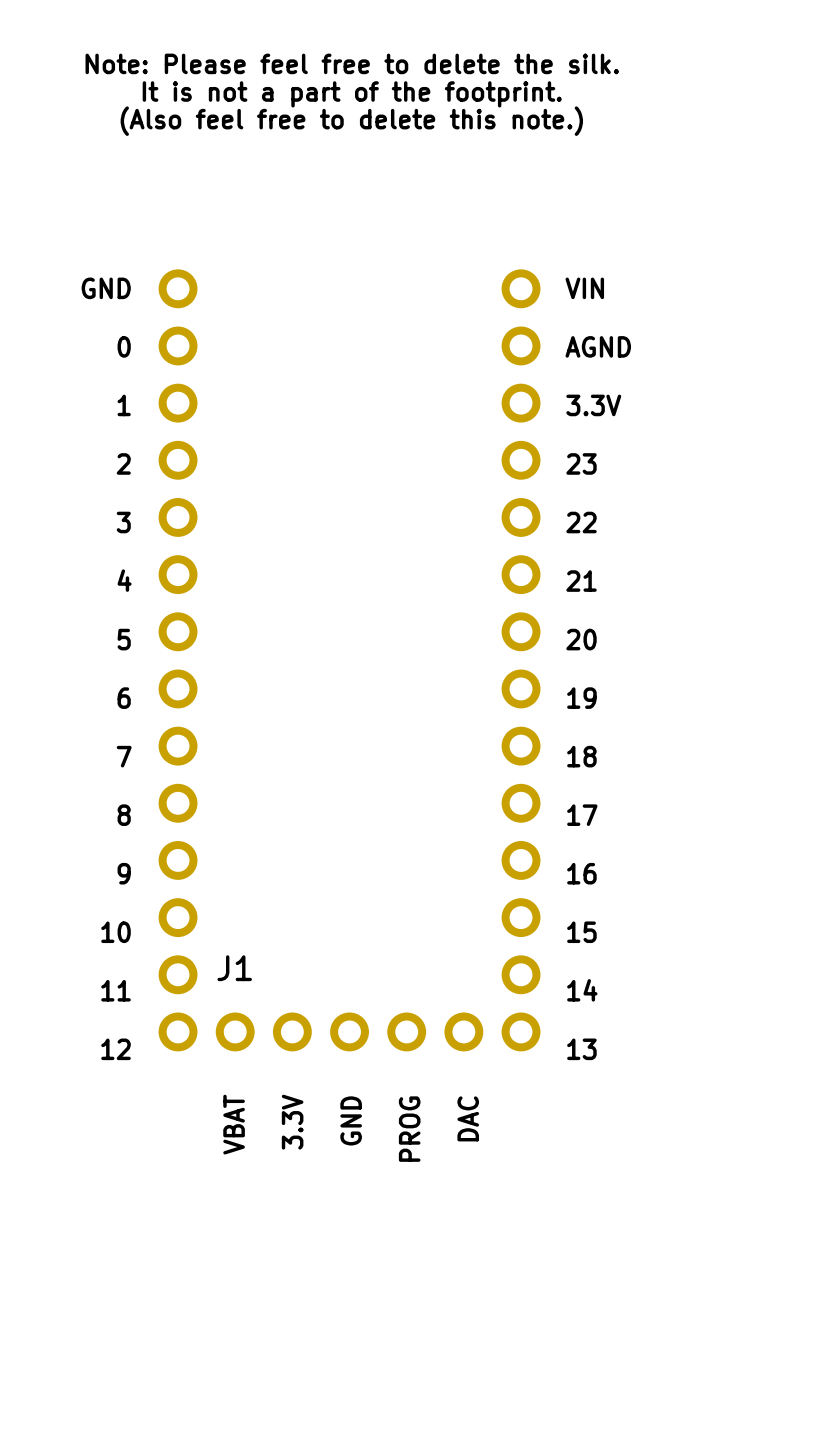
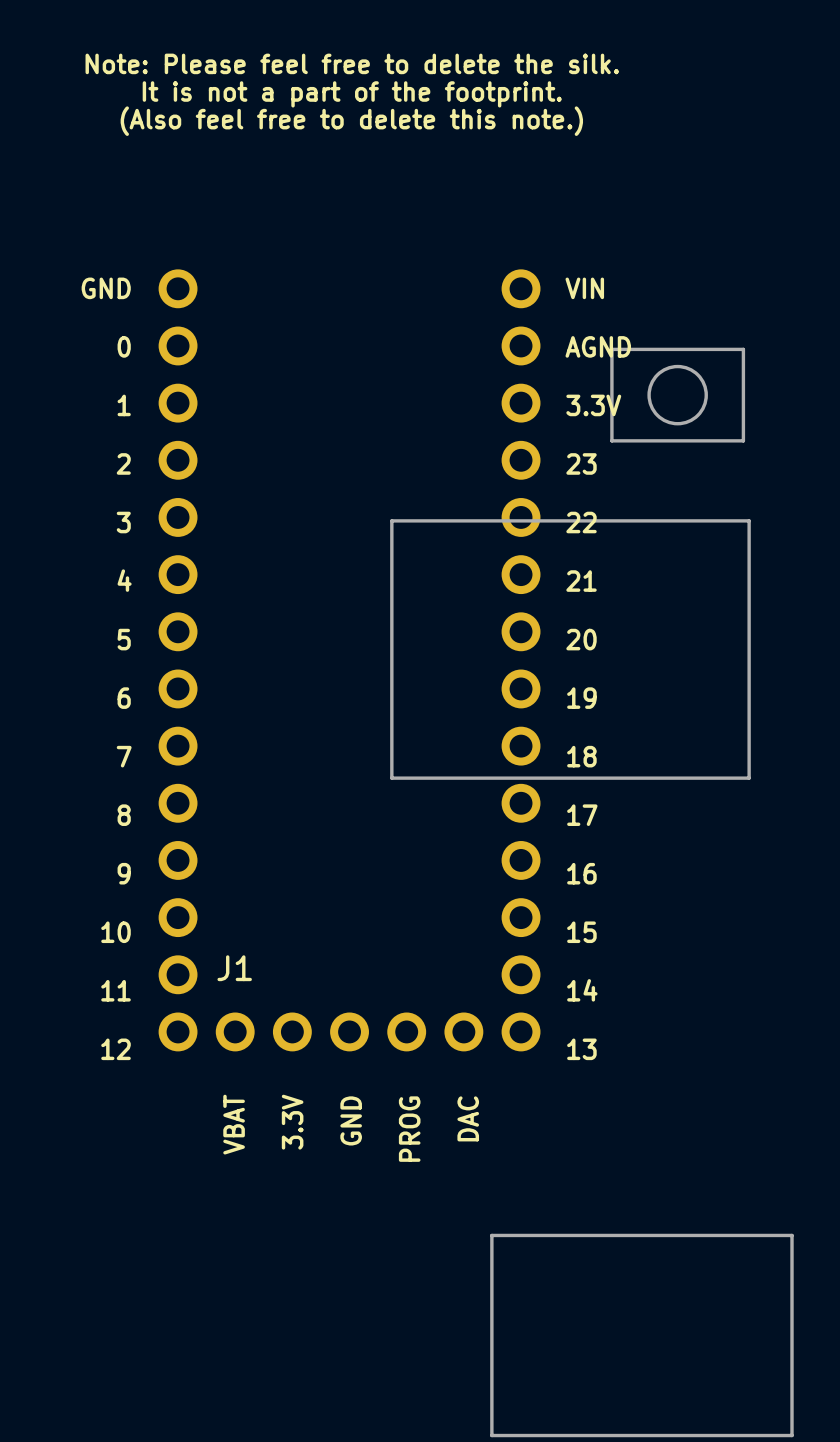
line: none -> (611, 349) (611, 440) (743, 440) (743, 349) (611, 349)
drawing: none -> [647, 364, 708, 426]
line: none -> (391, 520) (391, 778) (749, 778) (749, 520) (391, 520)
line: none -> (491, 1235) (491, 1435) (792, 1435) (792, 1235) (491, 1235)

